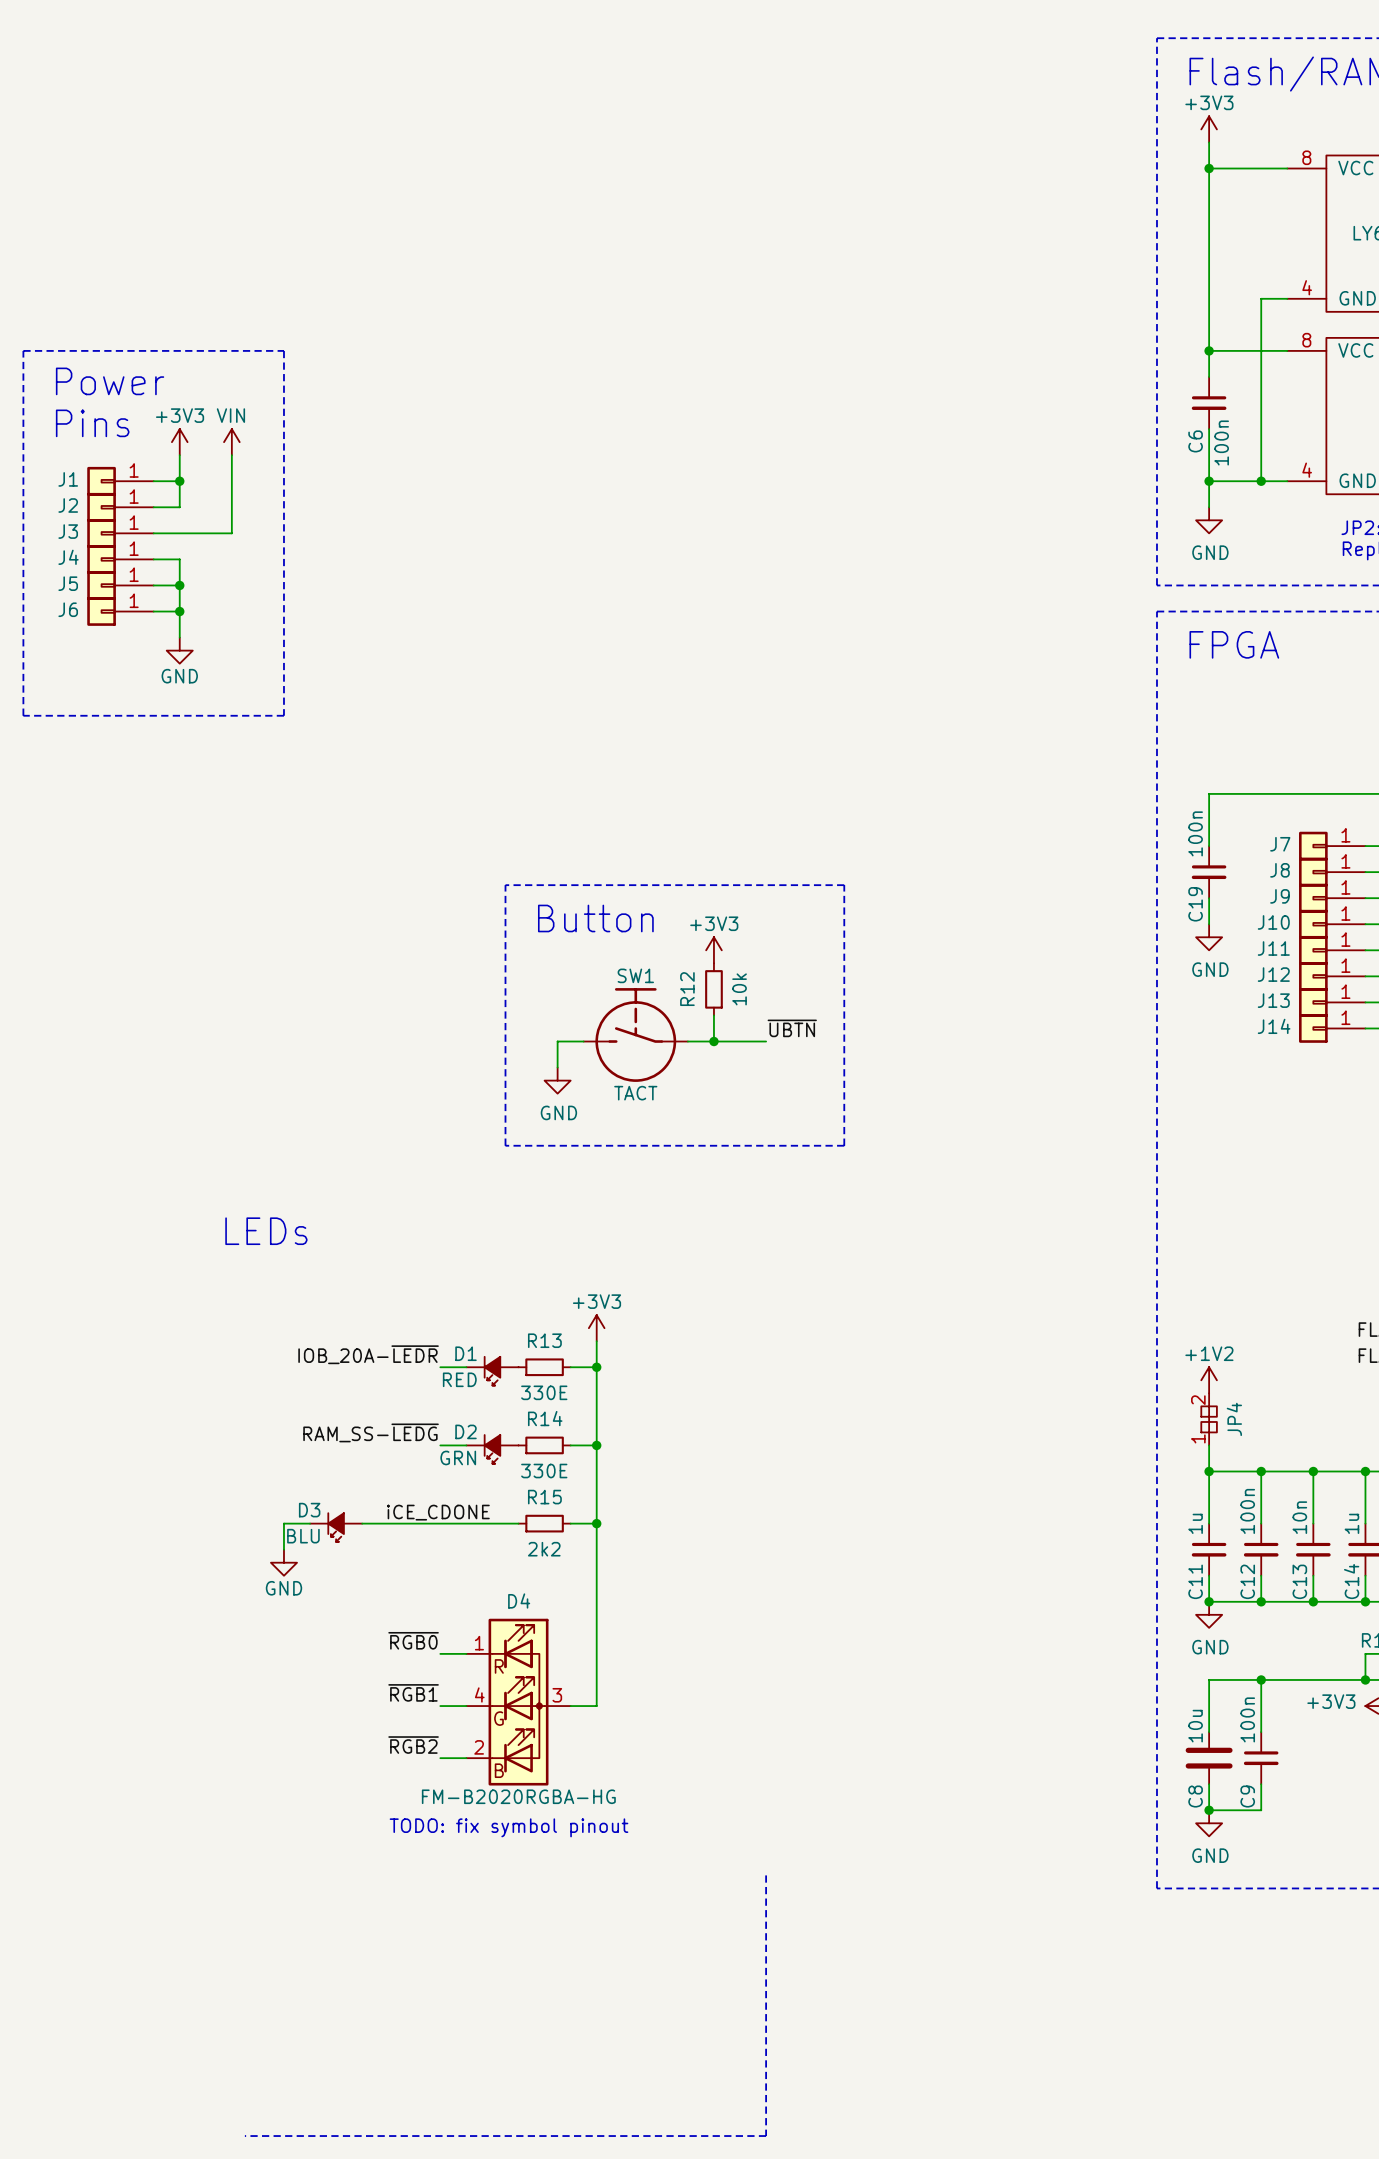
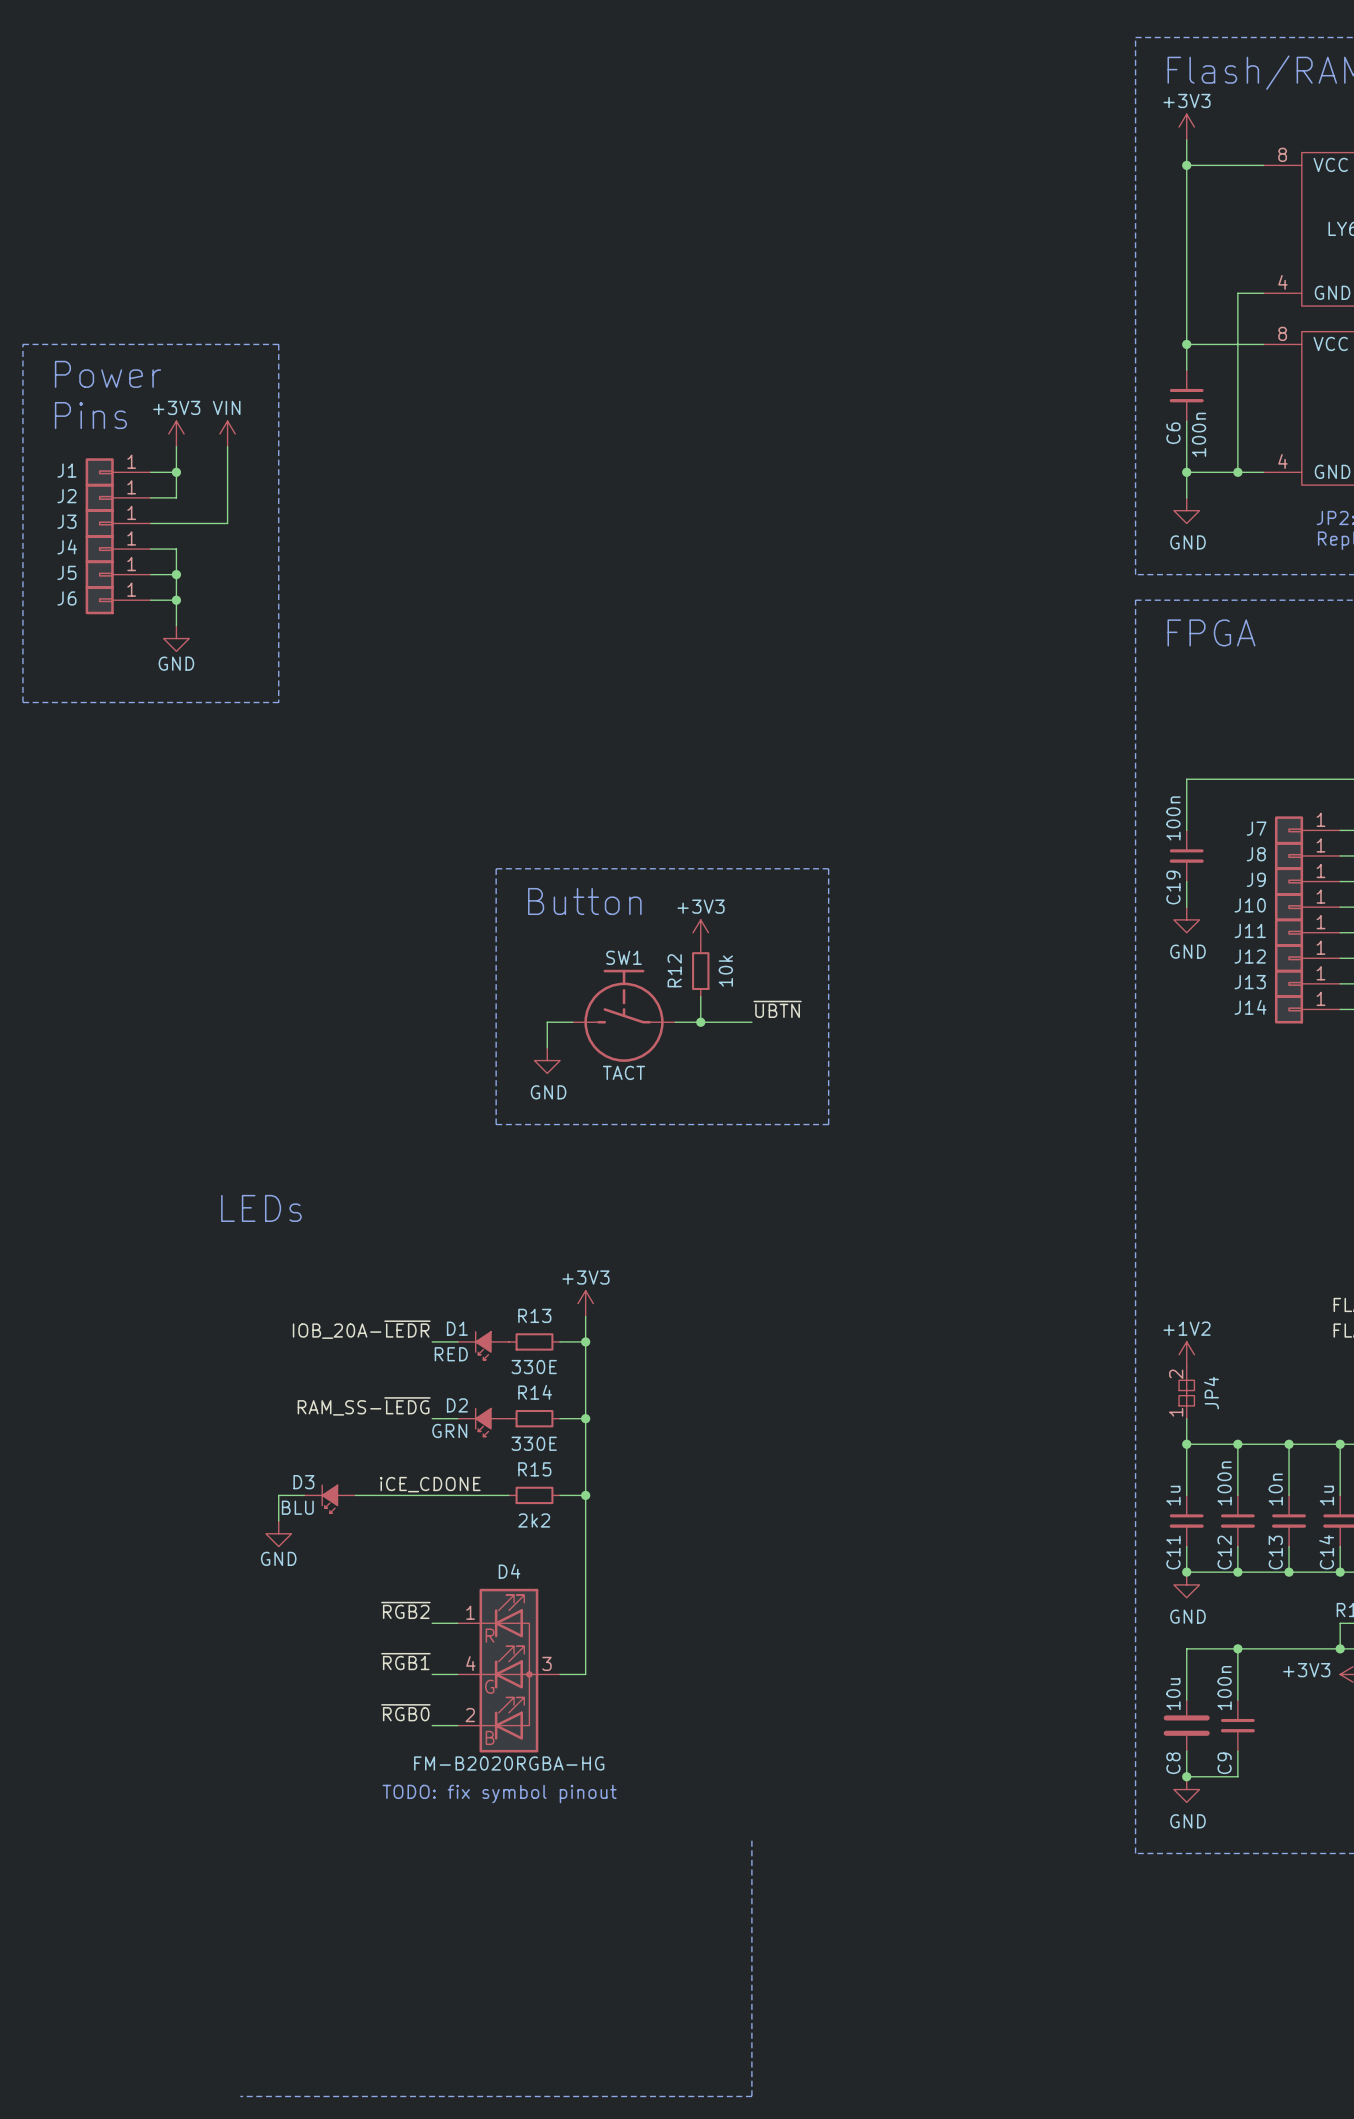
label: ~{RGB0} (413, 1640) -> ~{RGB2} (405, 1610)
label: ~{RGB2} (413, 1745) -> ~{RGB0} (405, 1712)

